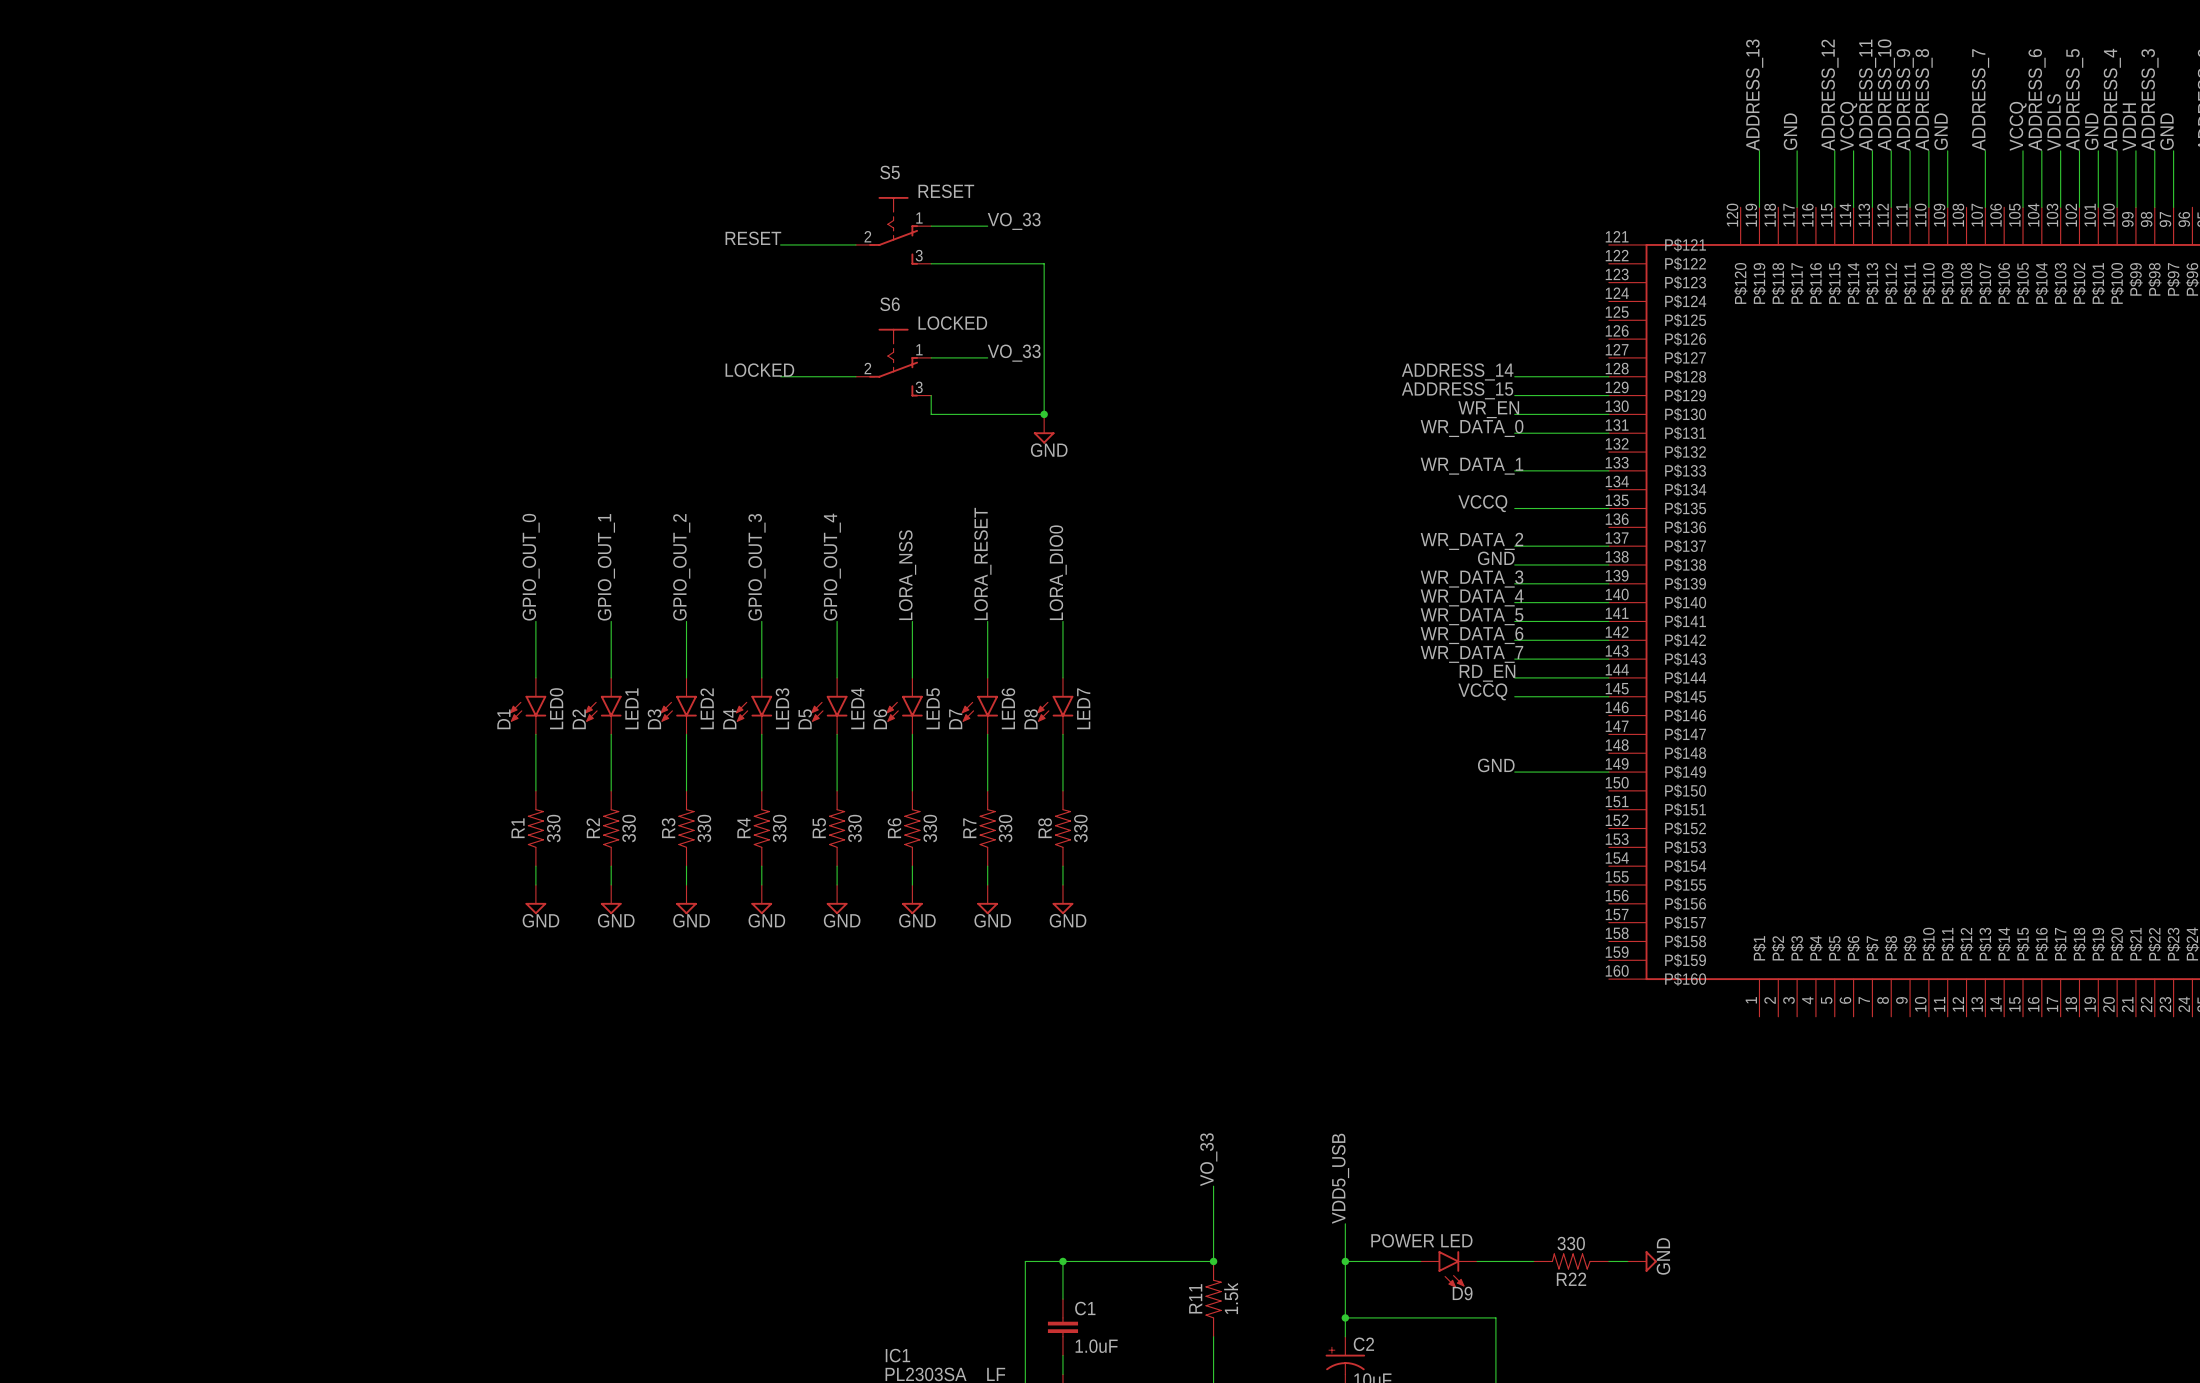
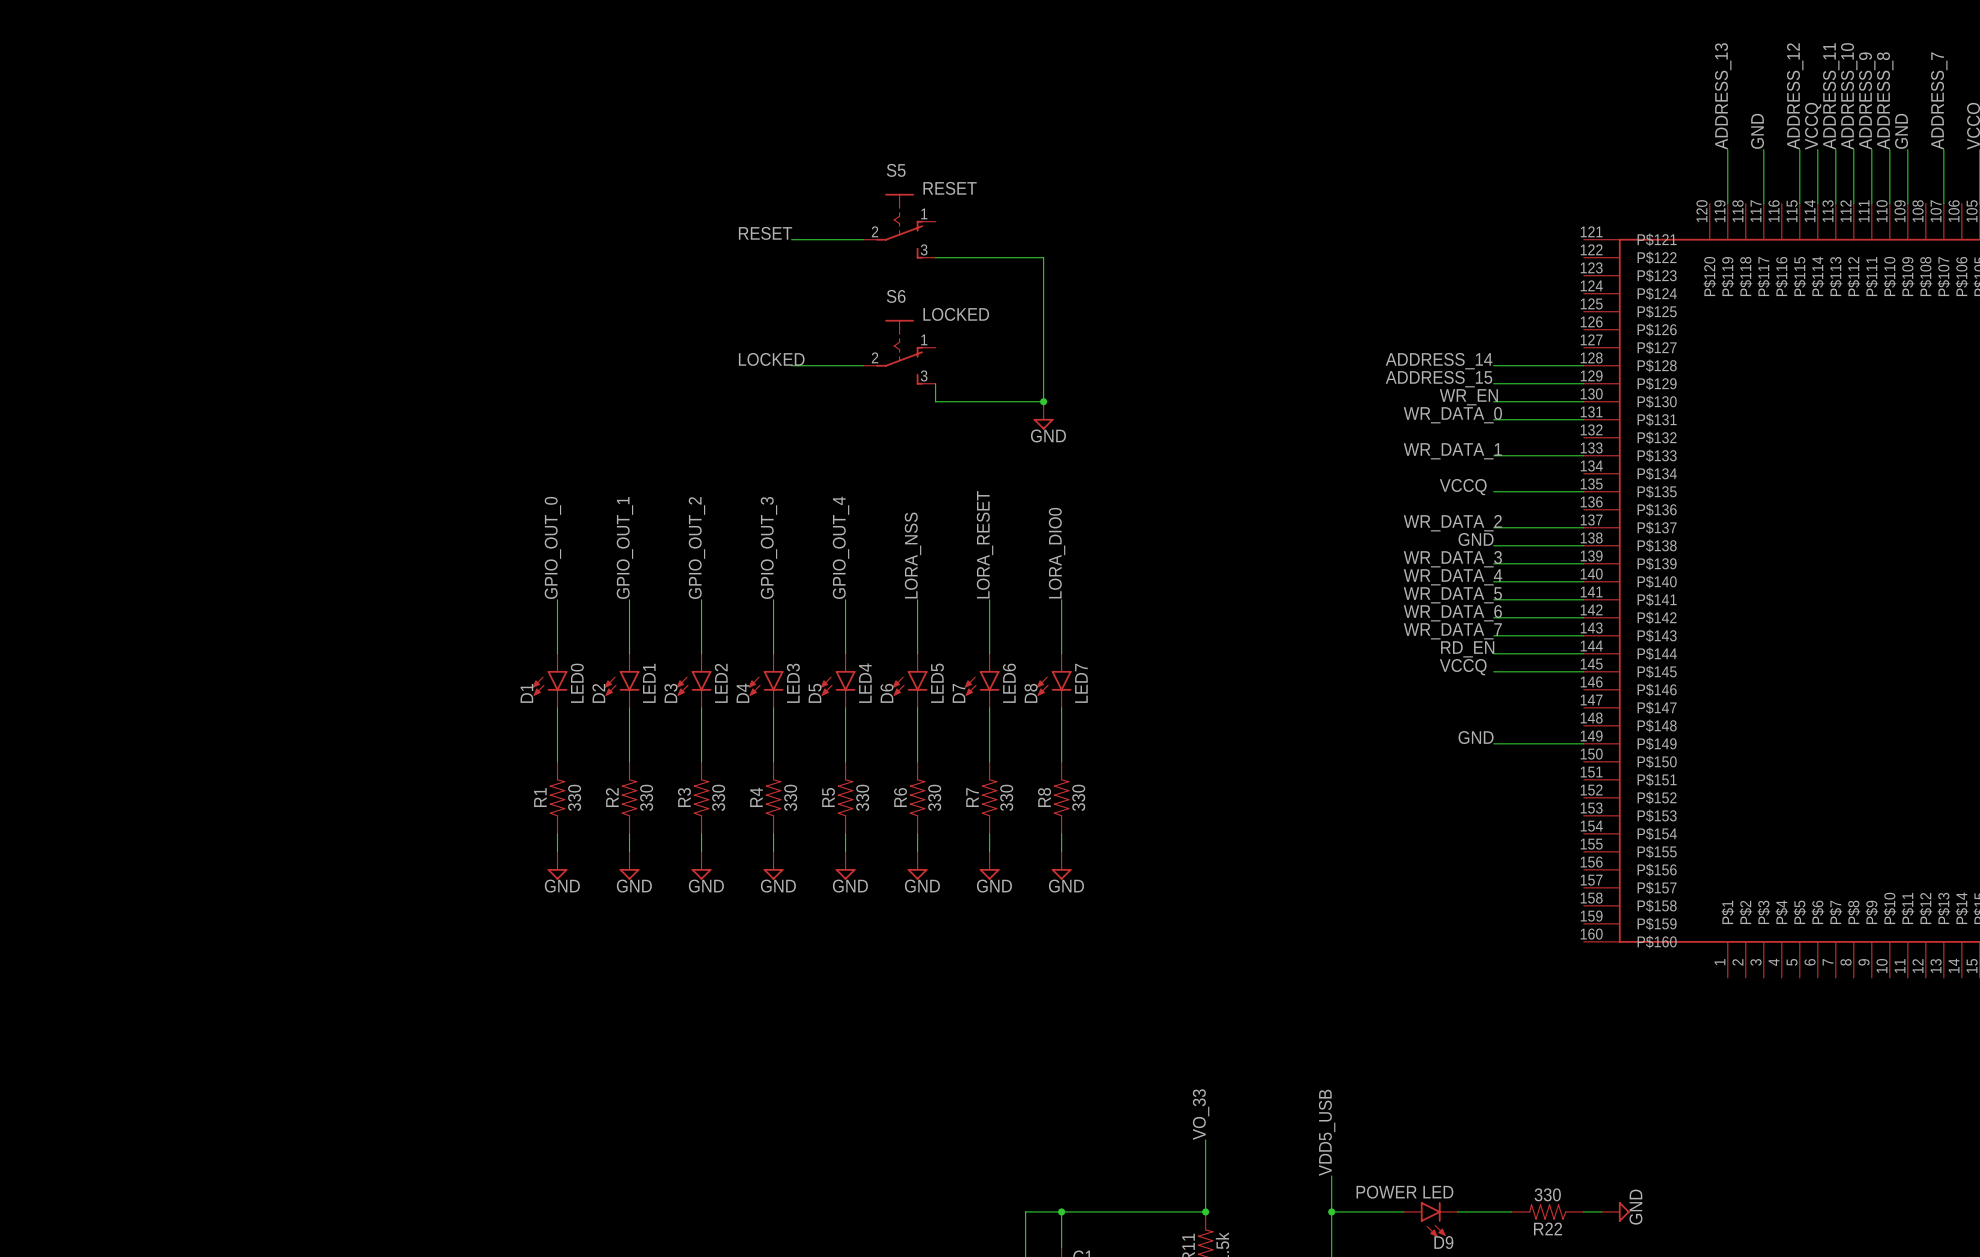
label: VO_33 (1014, 221) -> none
wire: (931, 226) (987, 226) -> none
label: VO_33 (1014, 353) -> none
wire: (931, 357) (987, 357) -> none

